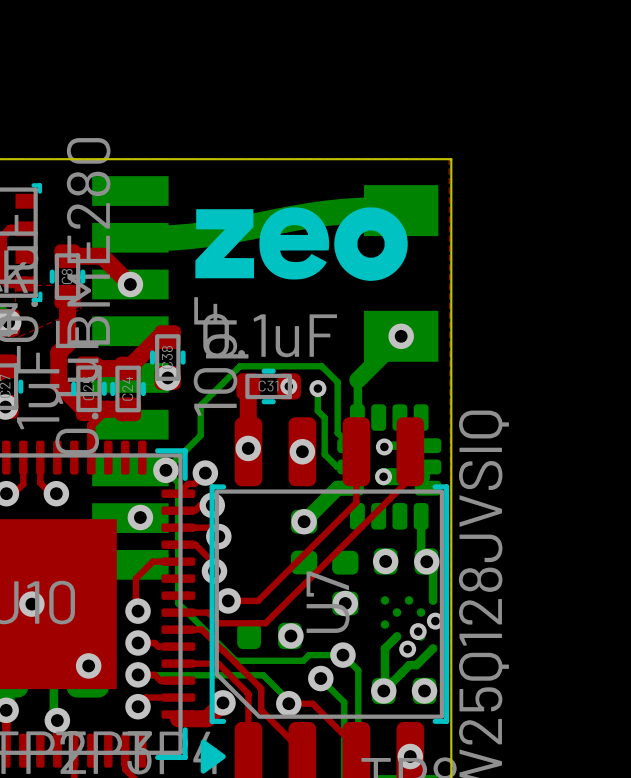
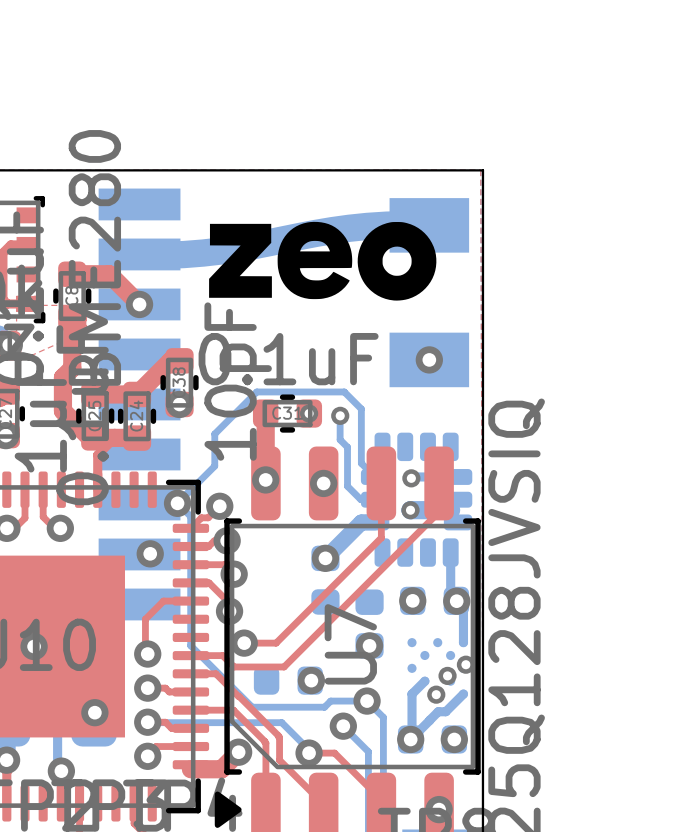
bottom track: (401, 336) (357, 380) (357, 417) -> none

